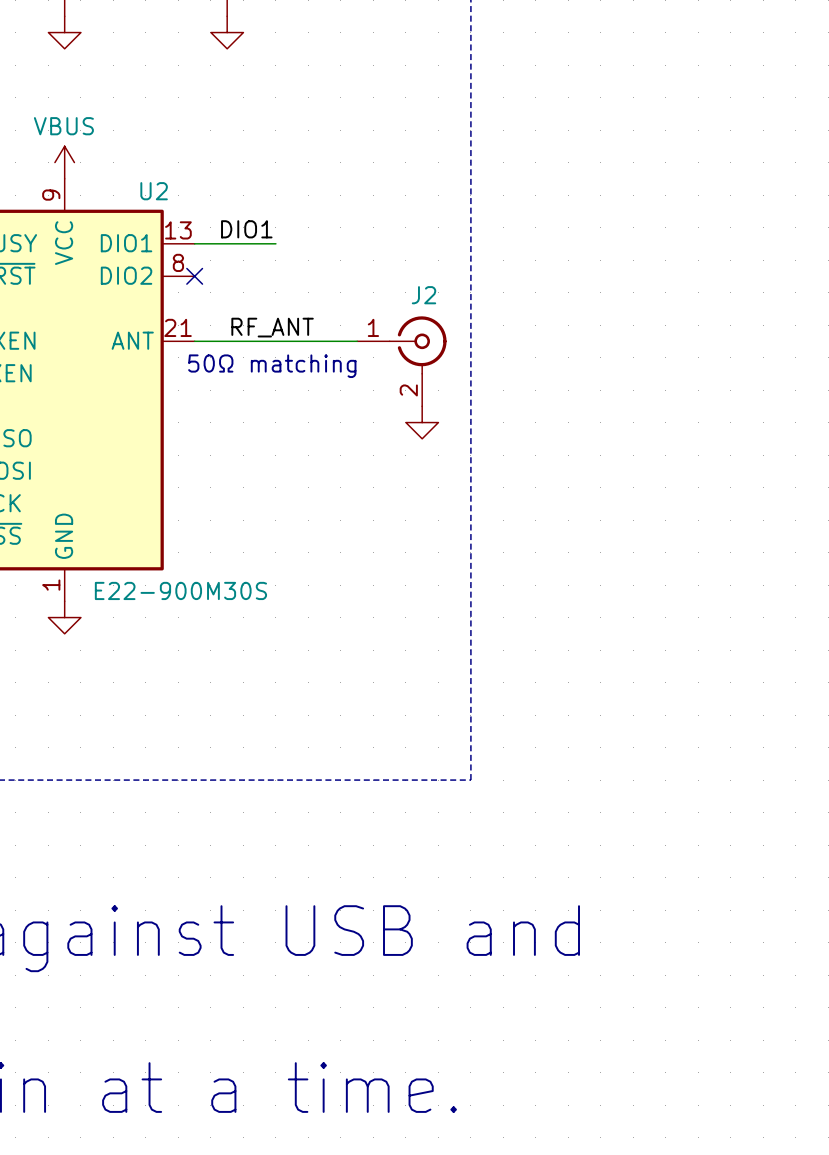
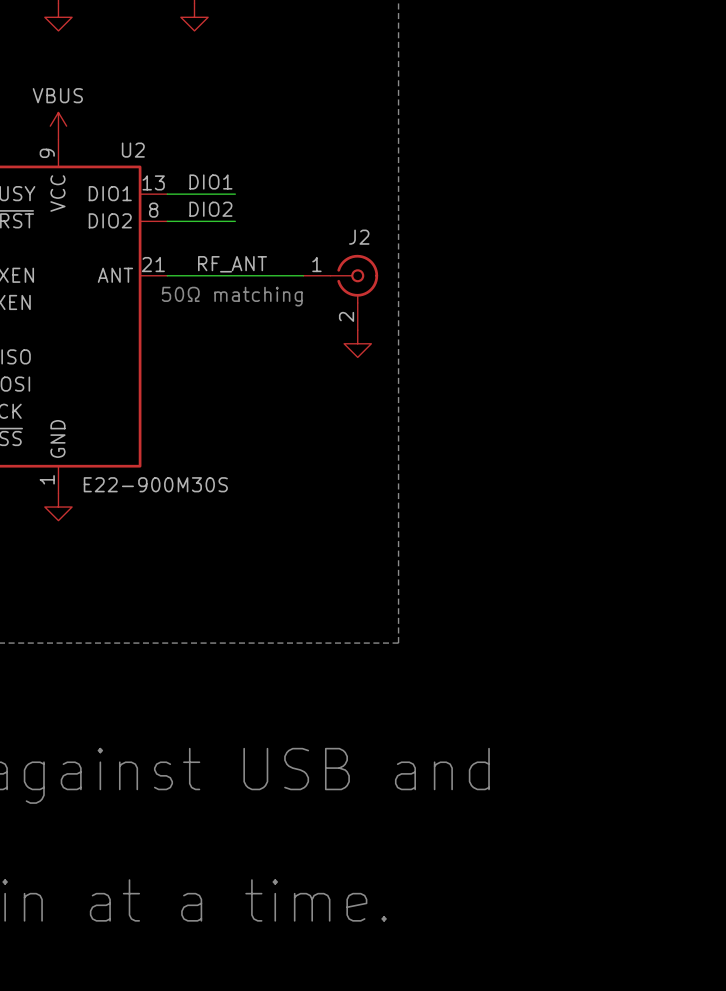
label: none -> DIO2 (210, 209)
wire: none -> (167, 221) (235, 221)
no-connect mark: (194, 276) -> none

